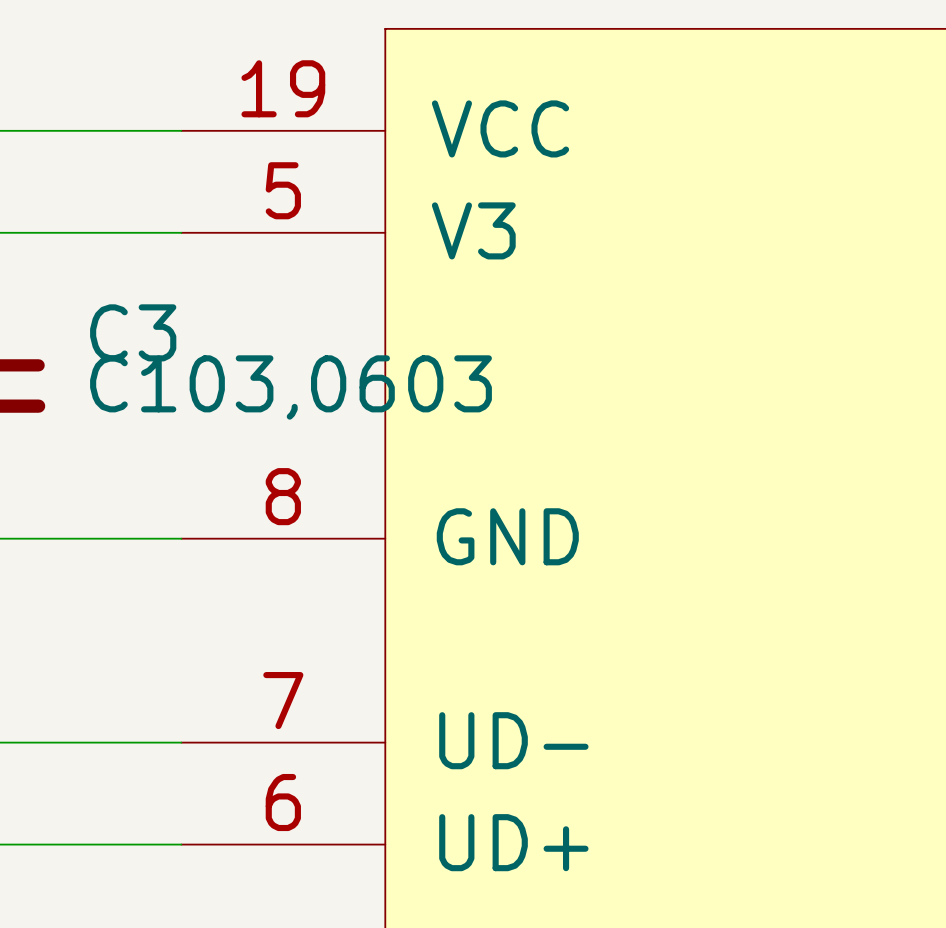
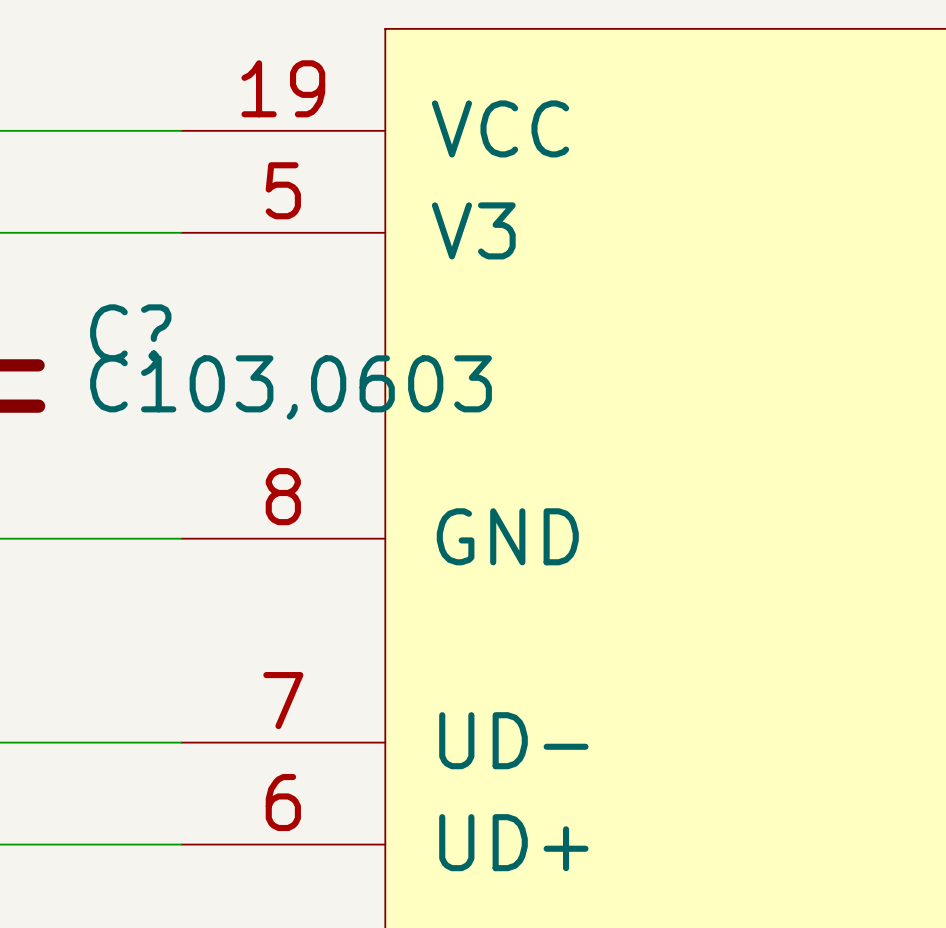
C3 name: C3 (133, 332) -> C? (130, 332)

